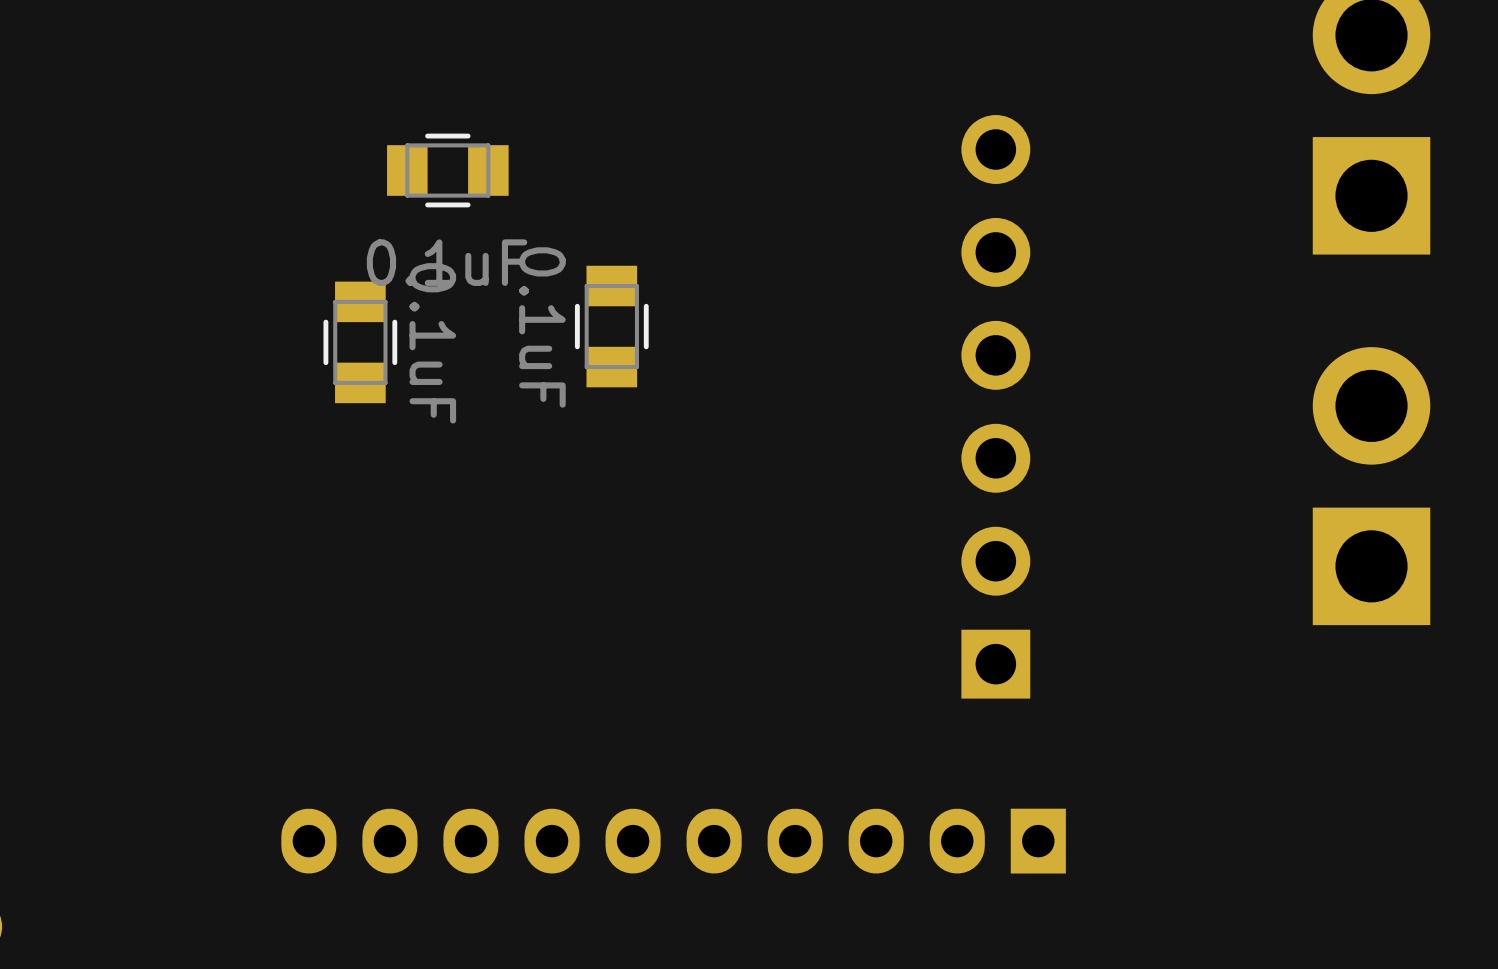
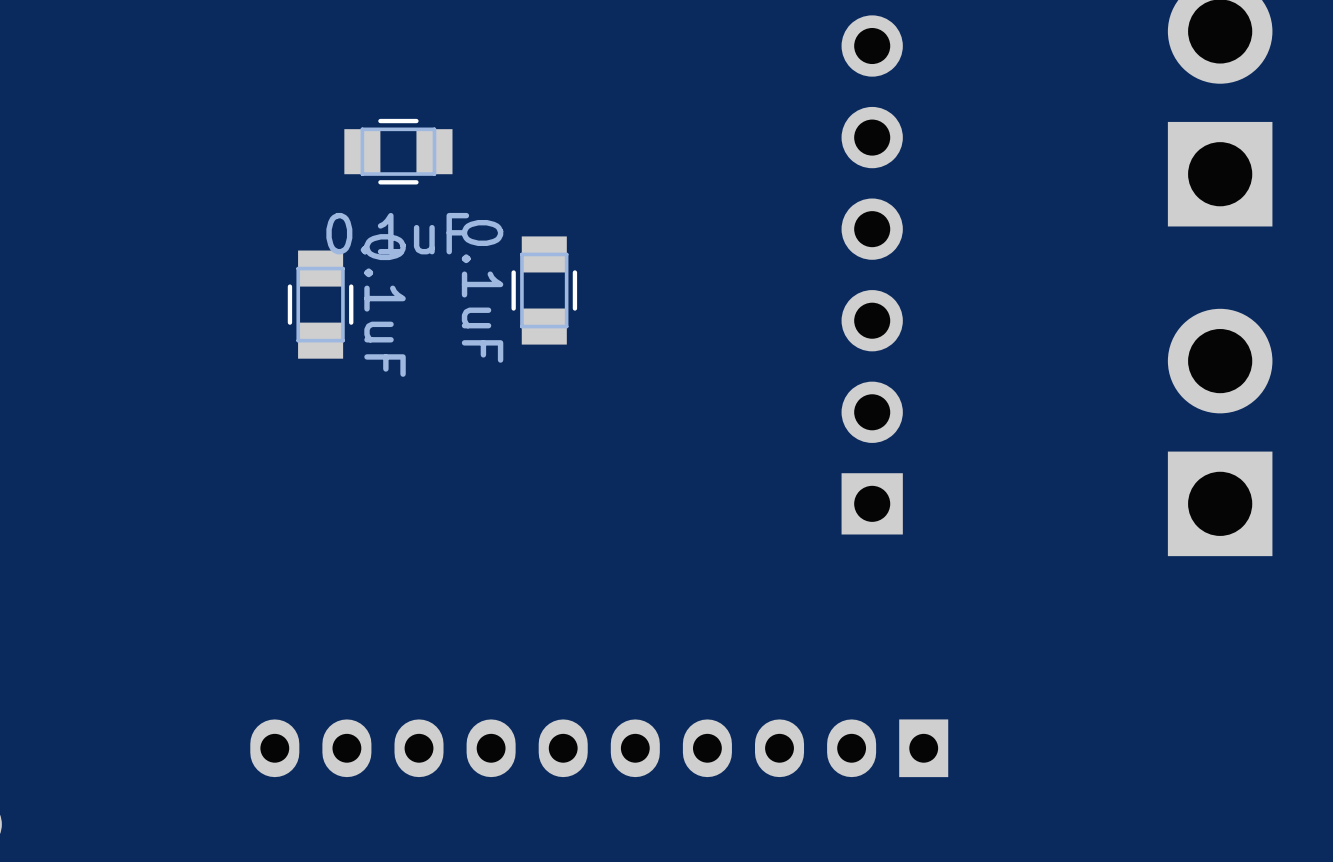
part position: (995, 406) -> (872, 274)

